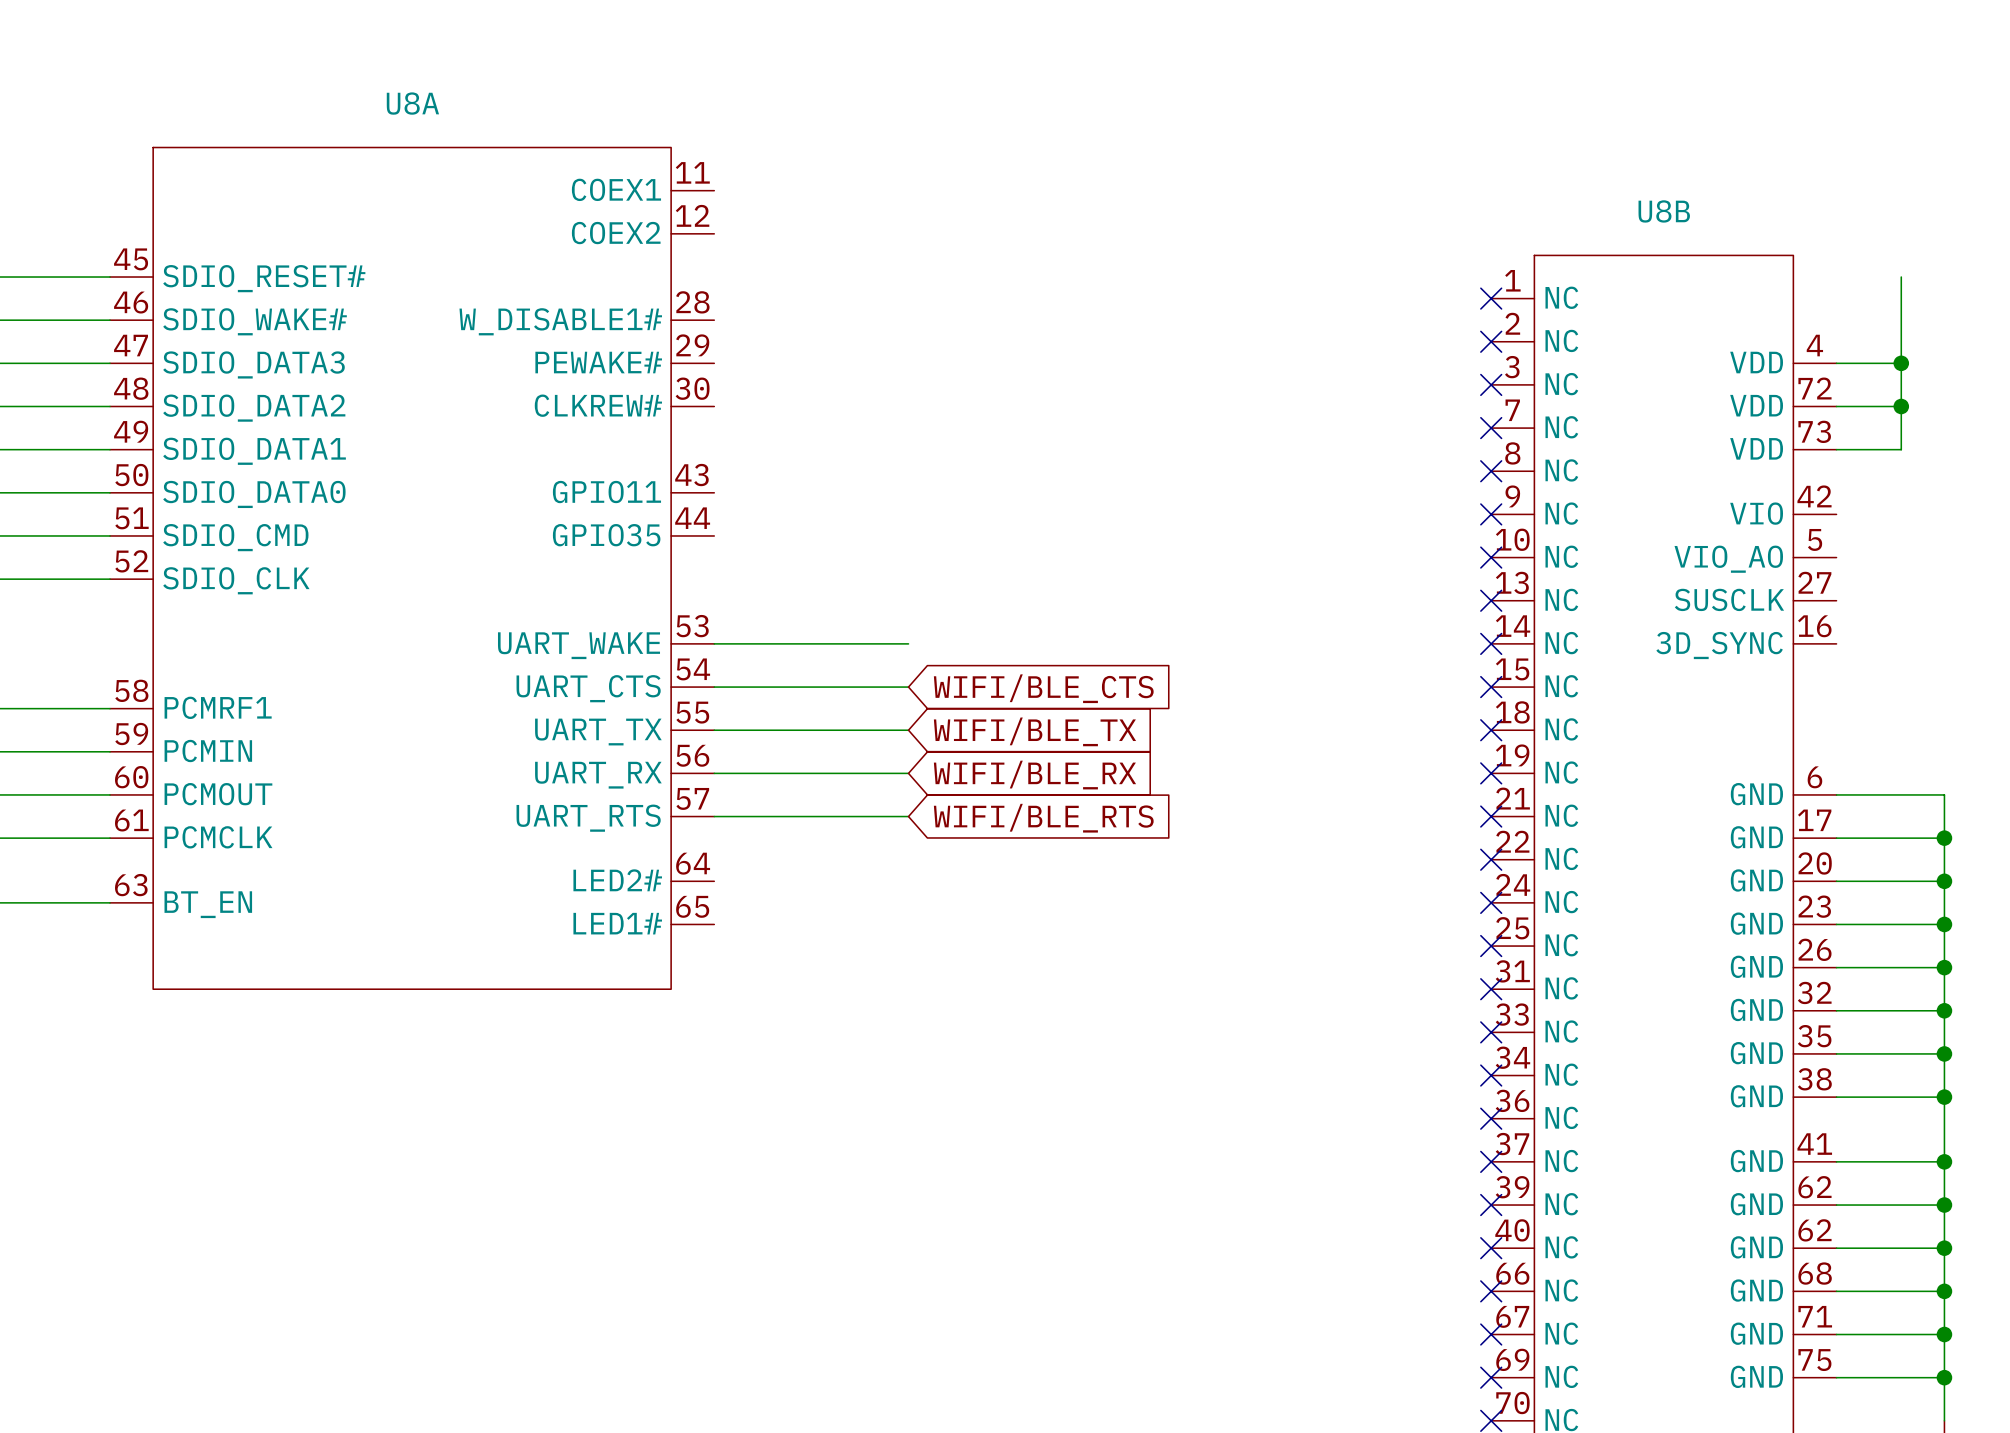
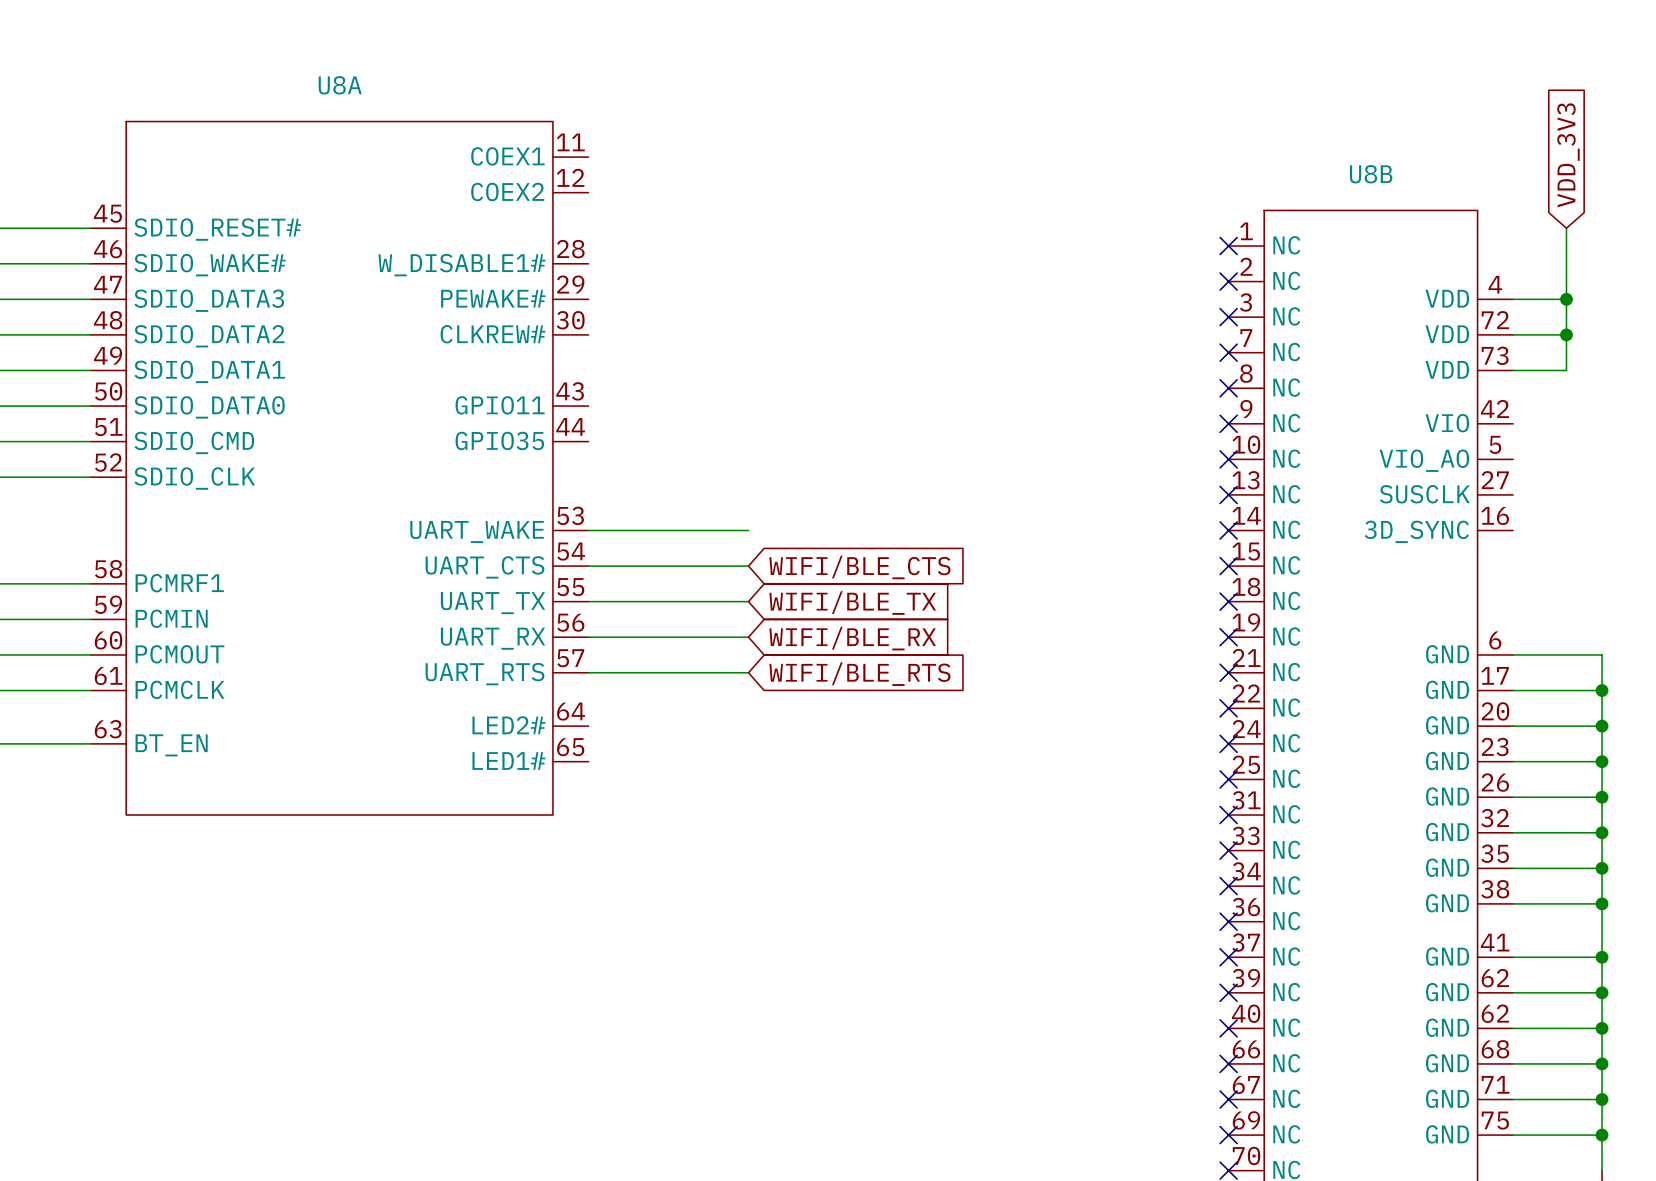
global label: none -> VDD_3V3 (1568, 155)

